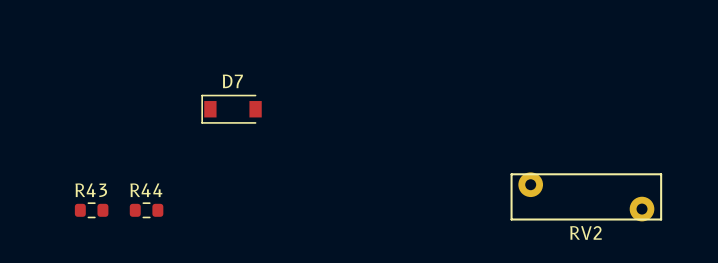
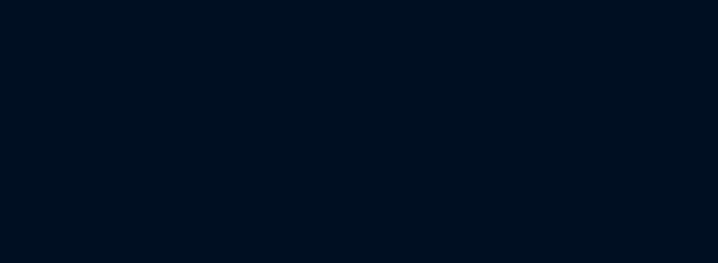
D7: (231, 109) -> none
RV2: (586, 196) -> none
R43: (91, 210) -> none
R44: (146, 210) -> none

